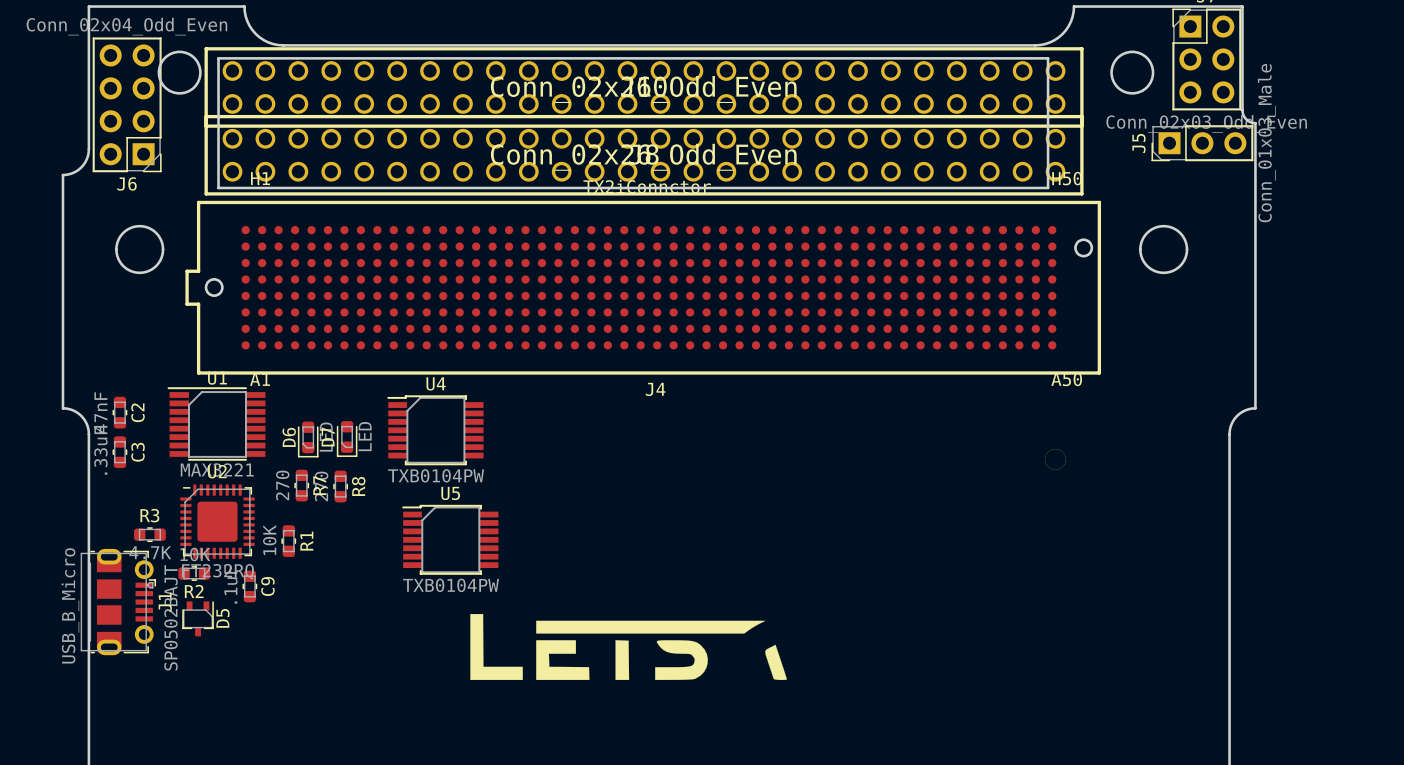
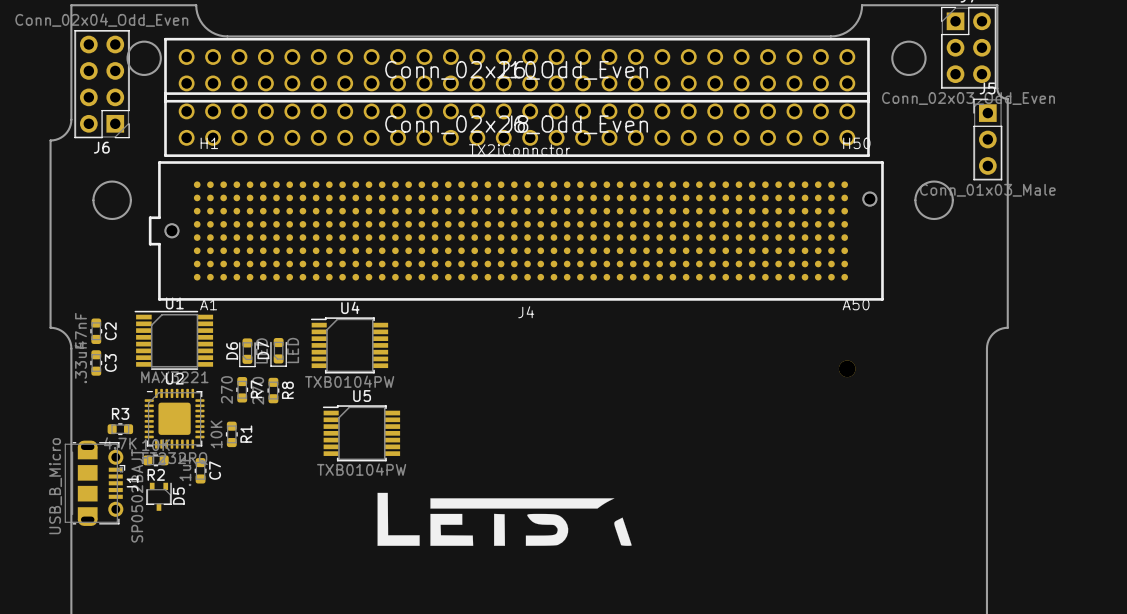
board edge: (218, 58) (218, 187) (1048, 187) (1048, 58) (218, 58) -> none
J5 rotation: 0° (1202, 143) -> 90° clockwise (987, 139)
C9 name: C9 (267, 586) -> C7 (215, 470)

